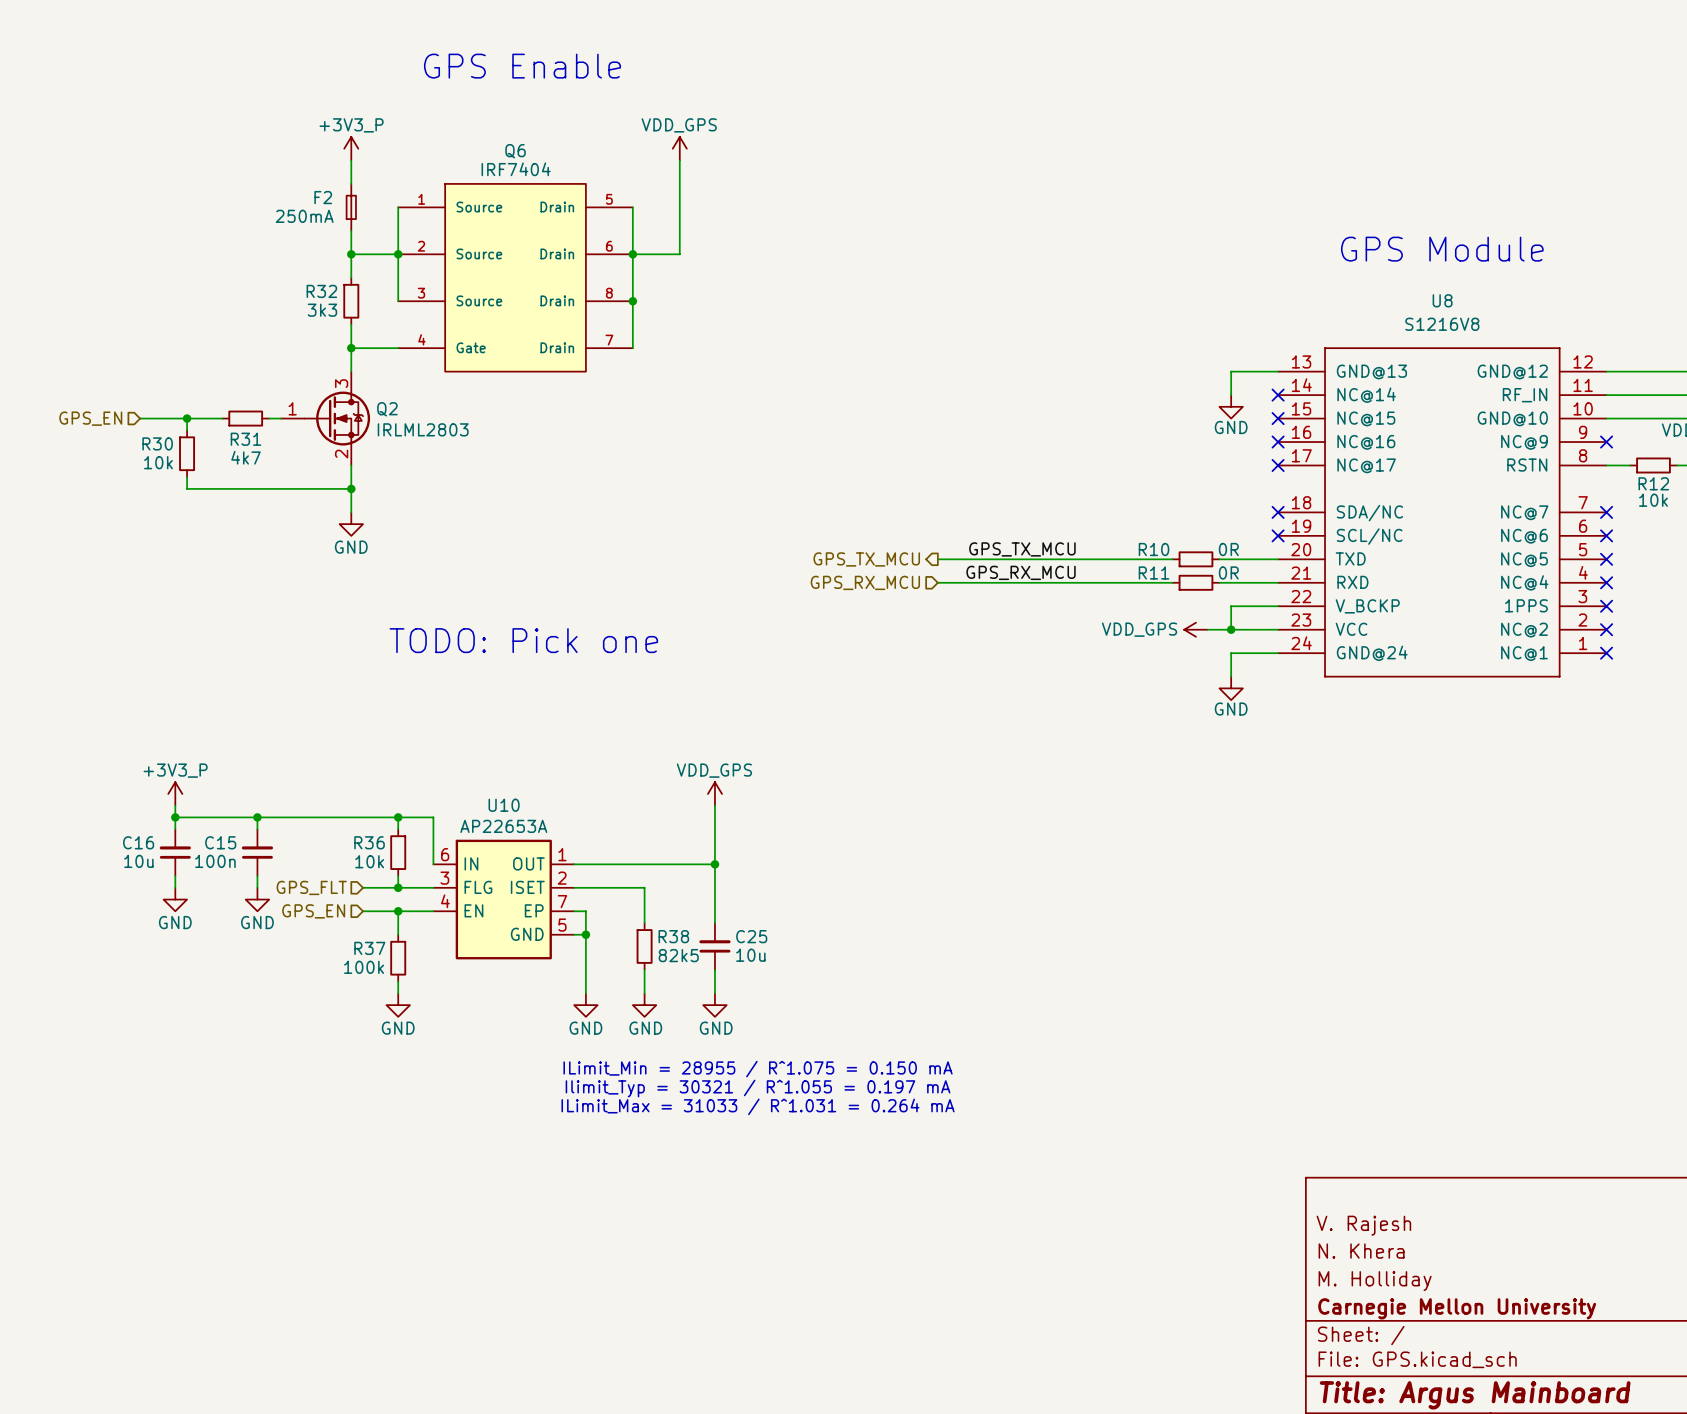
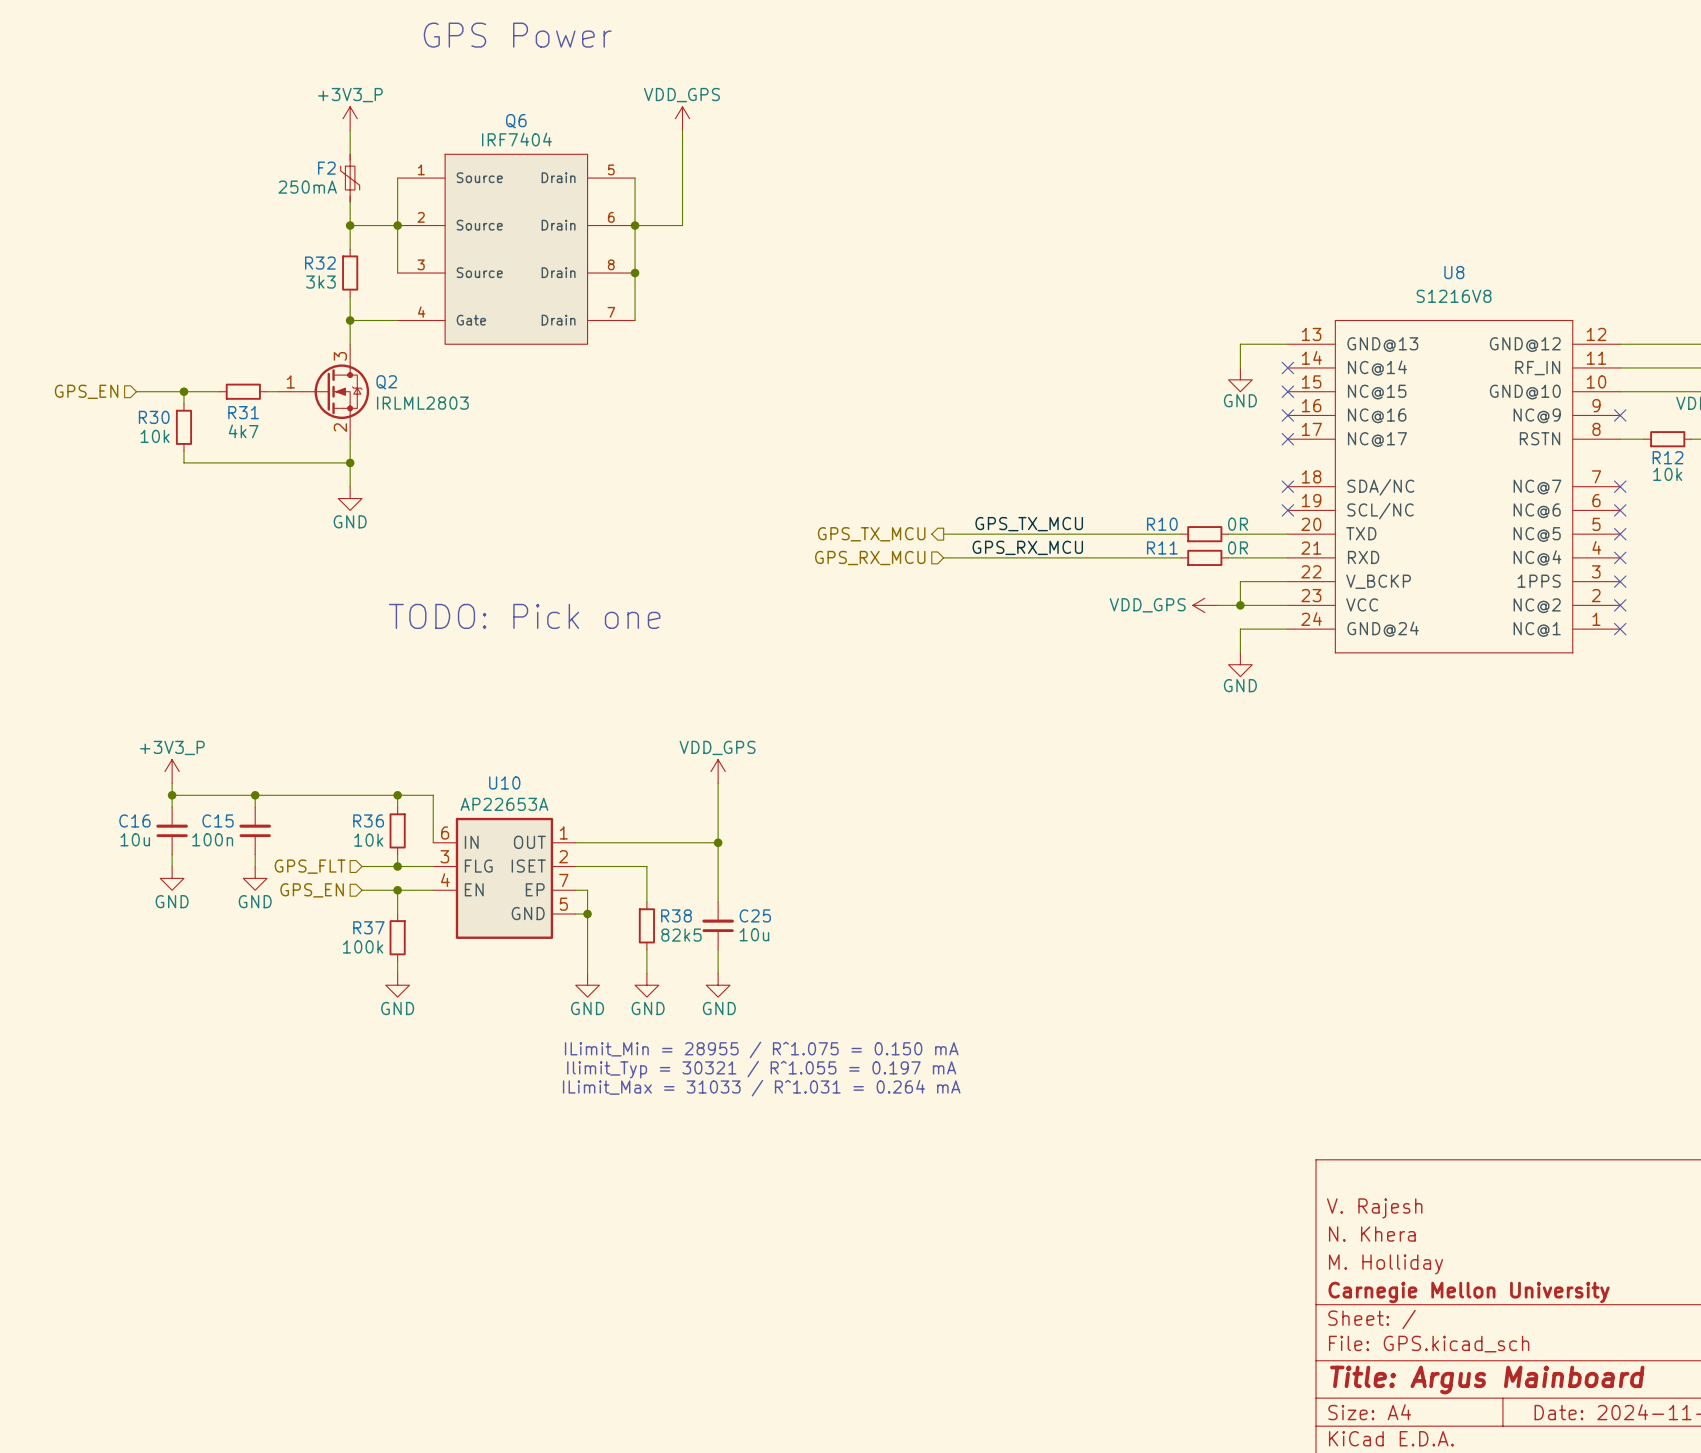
text: GPS Enable (522, 66) -> GPS Power (517, 35)
F2 symbol: [346, 183, 356, 231] -> [340, 154, 360, 202]
text: GPS Module (1442, 249) -> none

